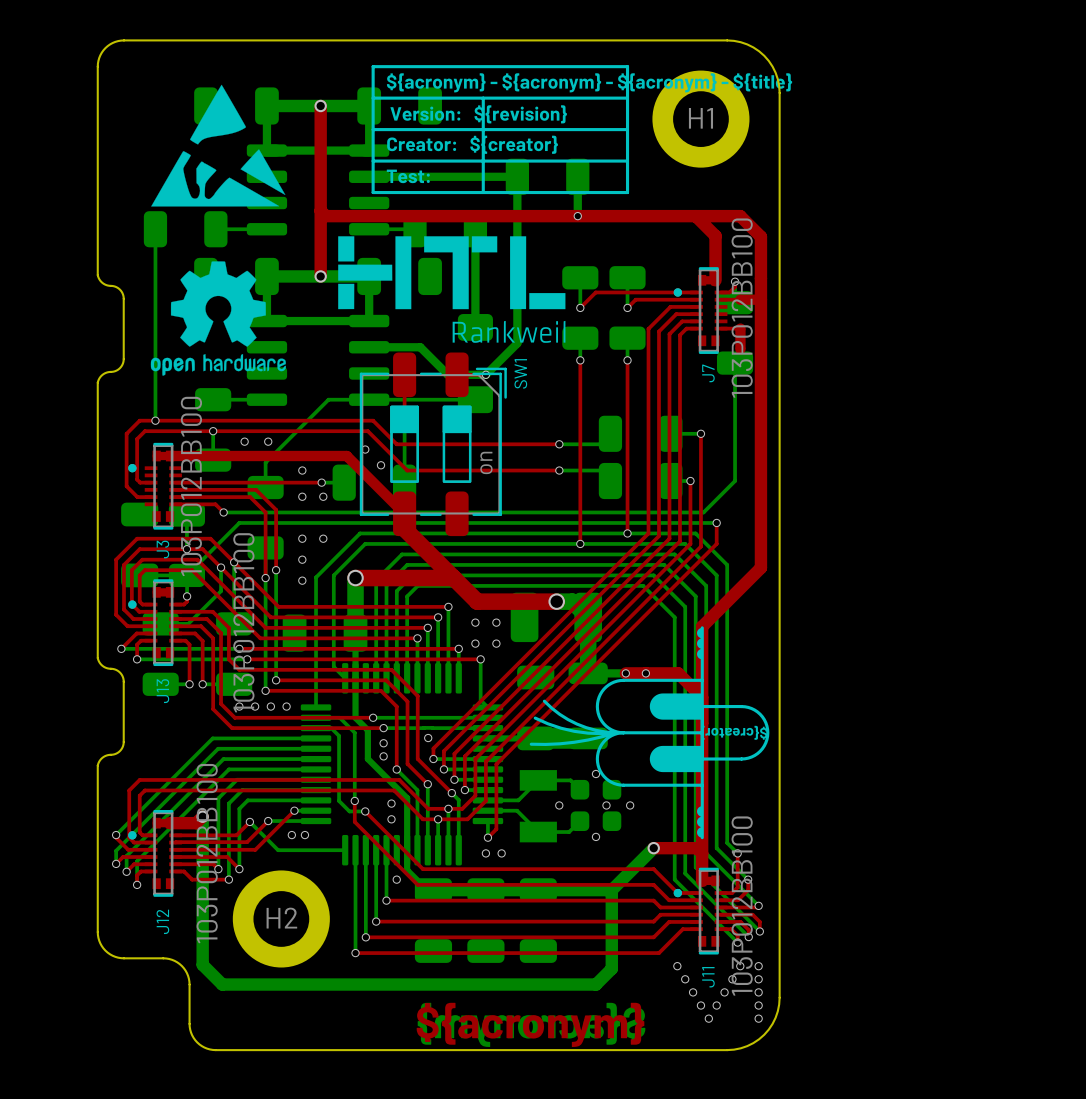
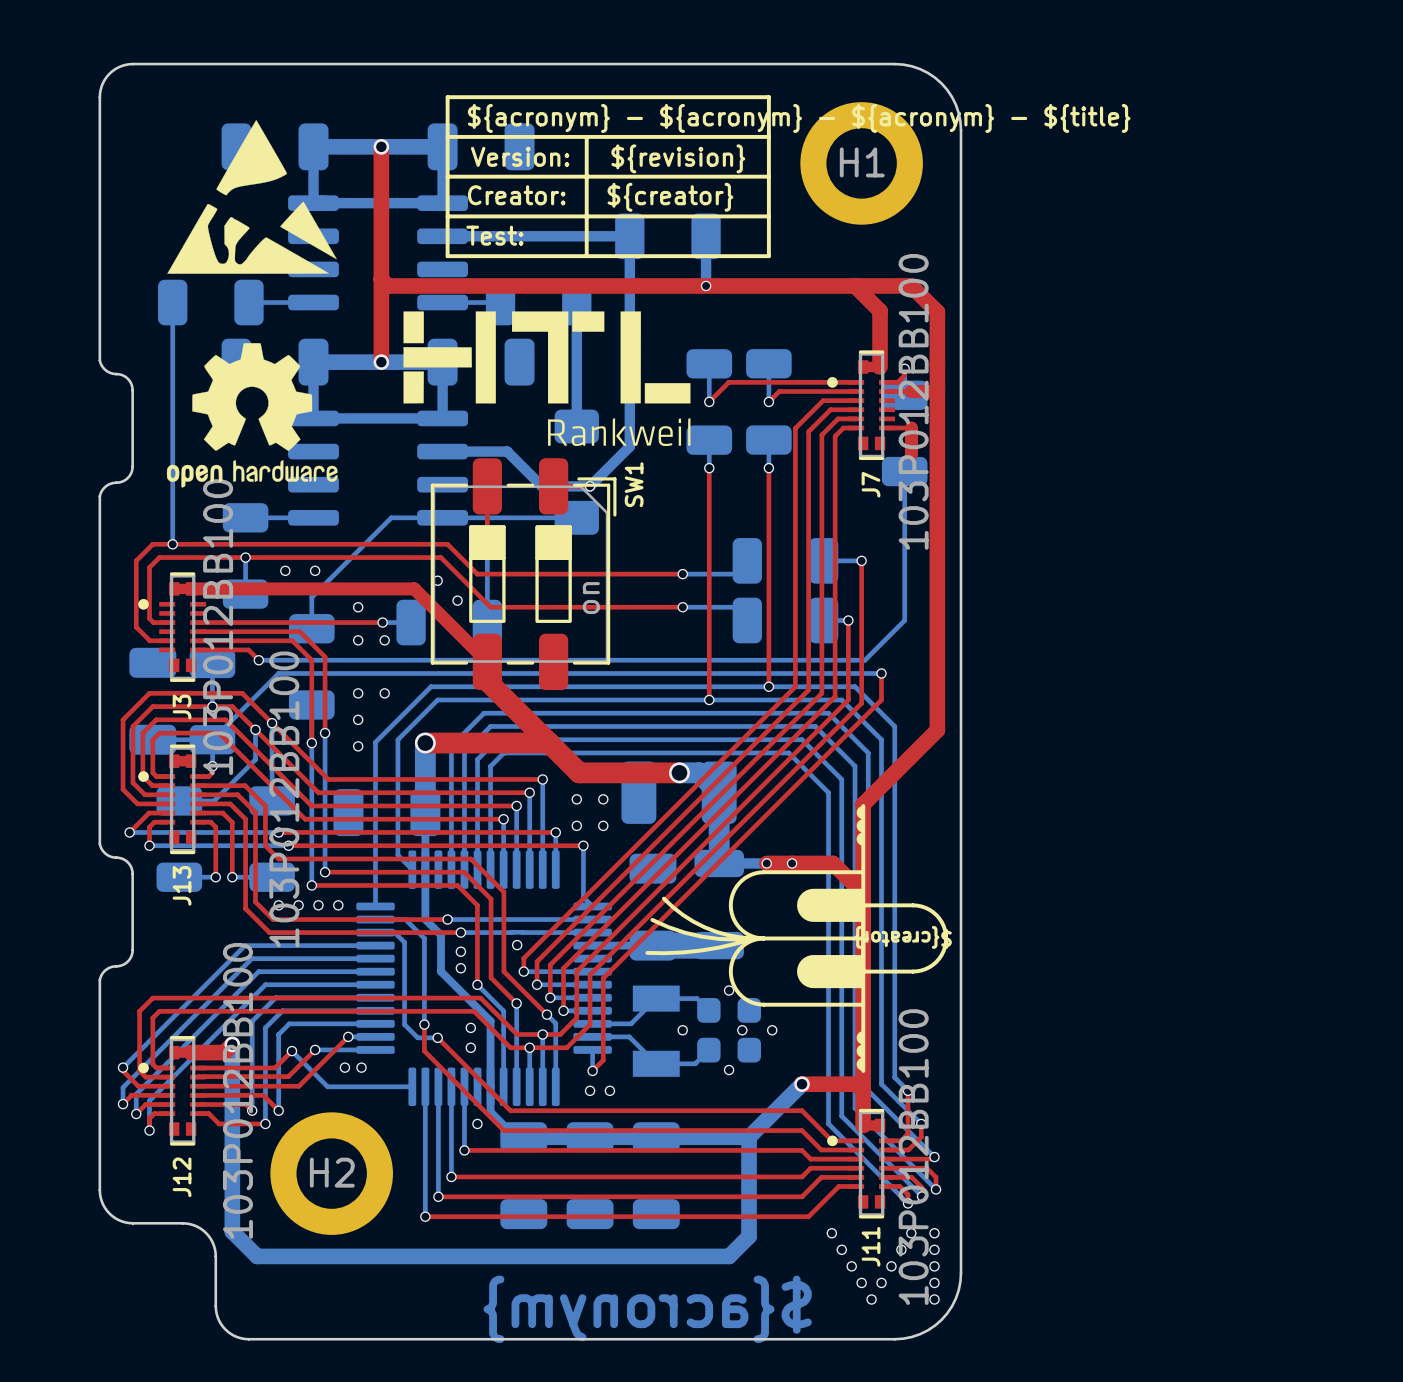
text: ${acronym} (530, 1024) -> none

